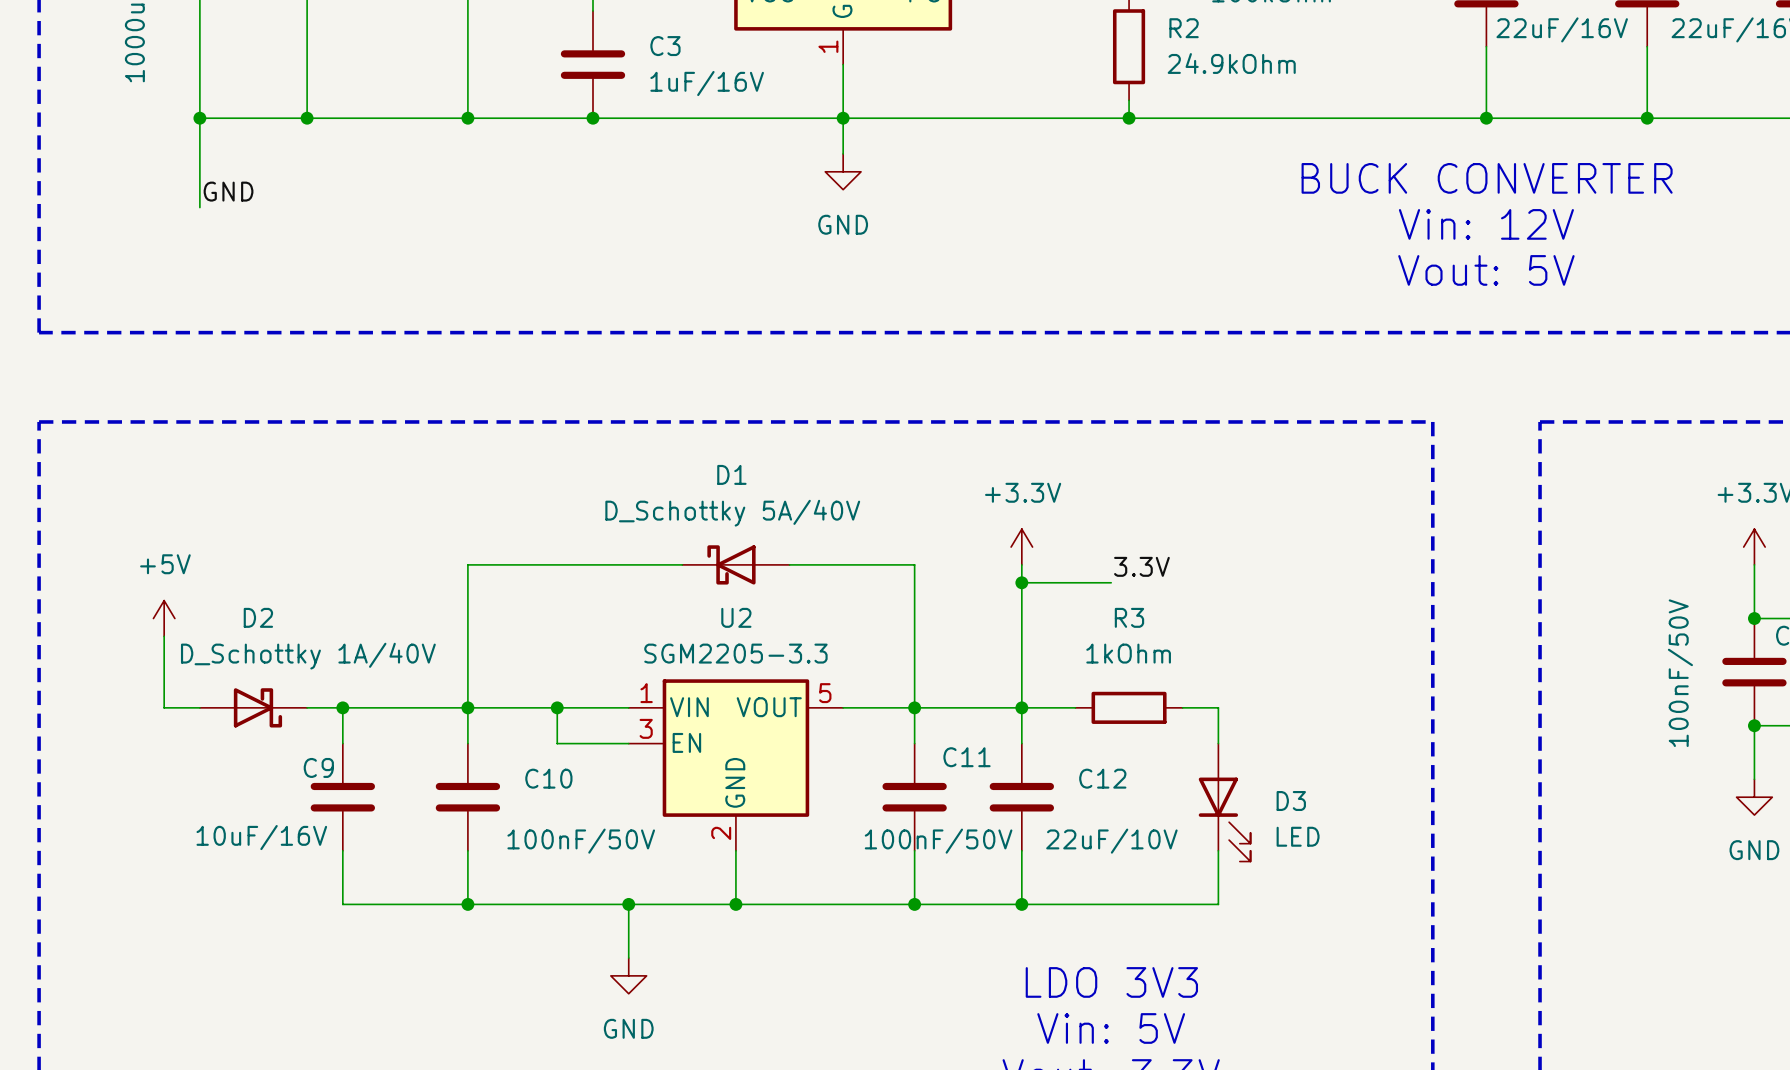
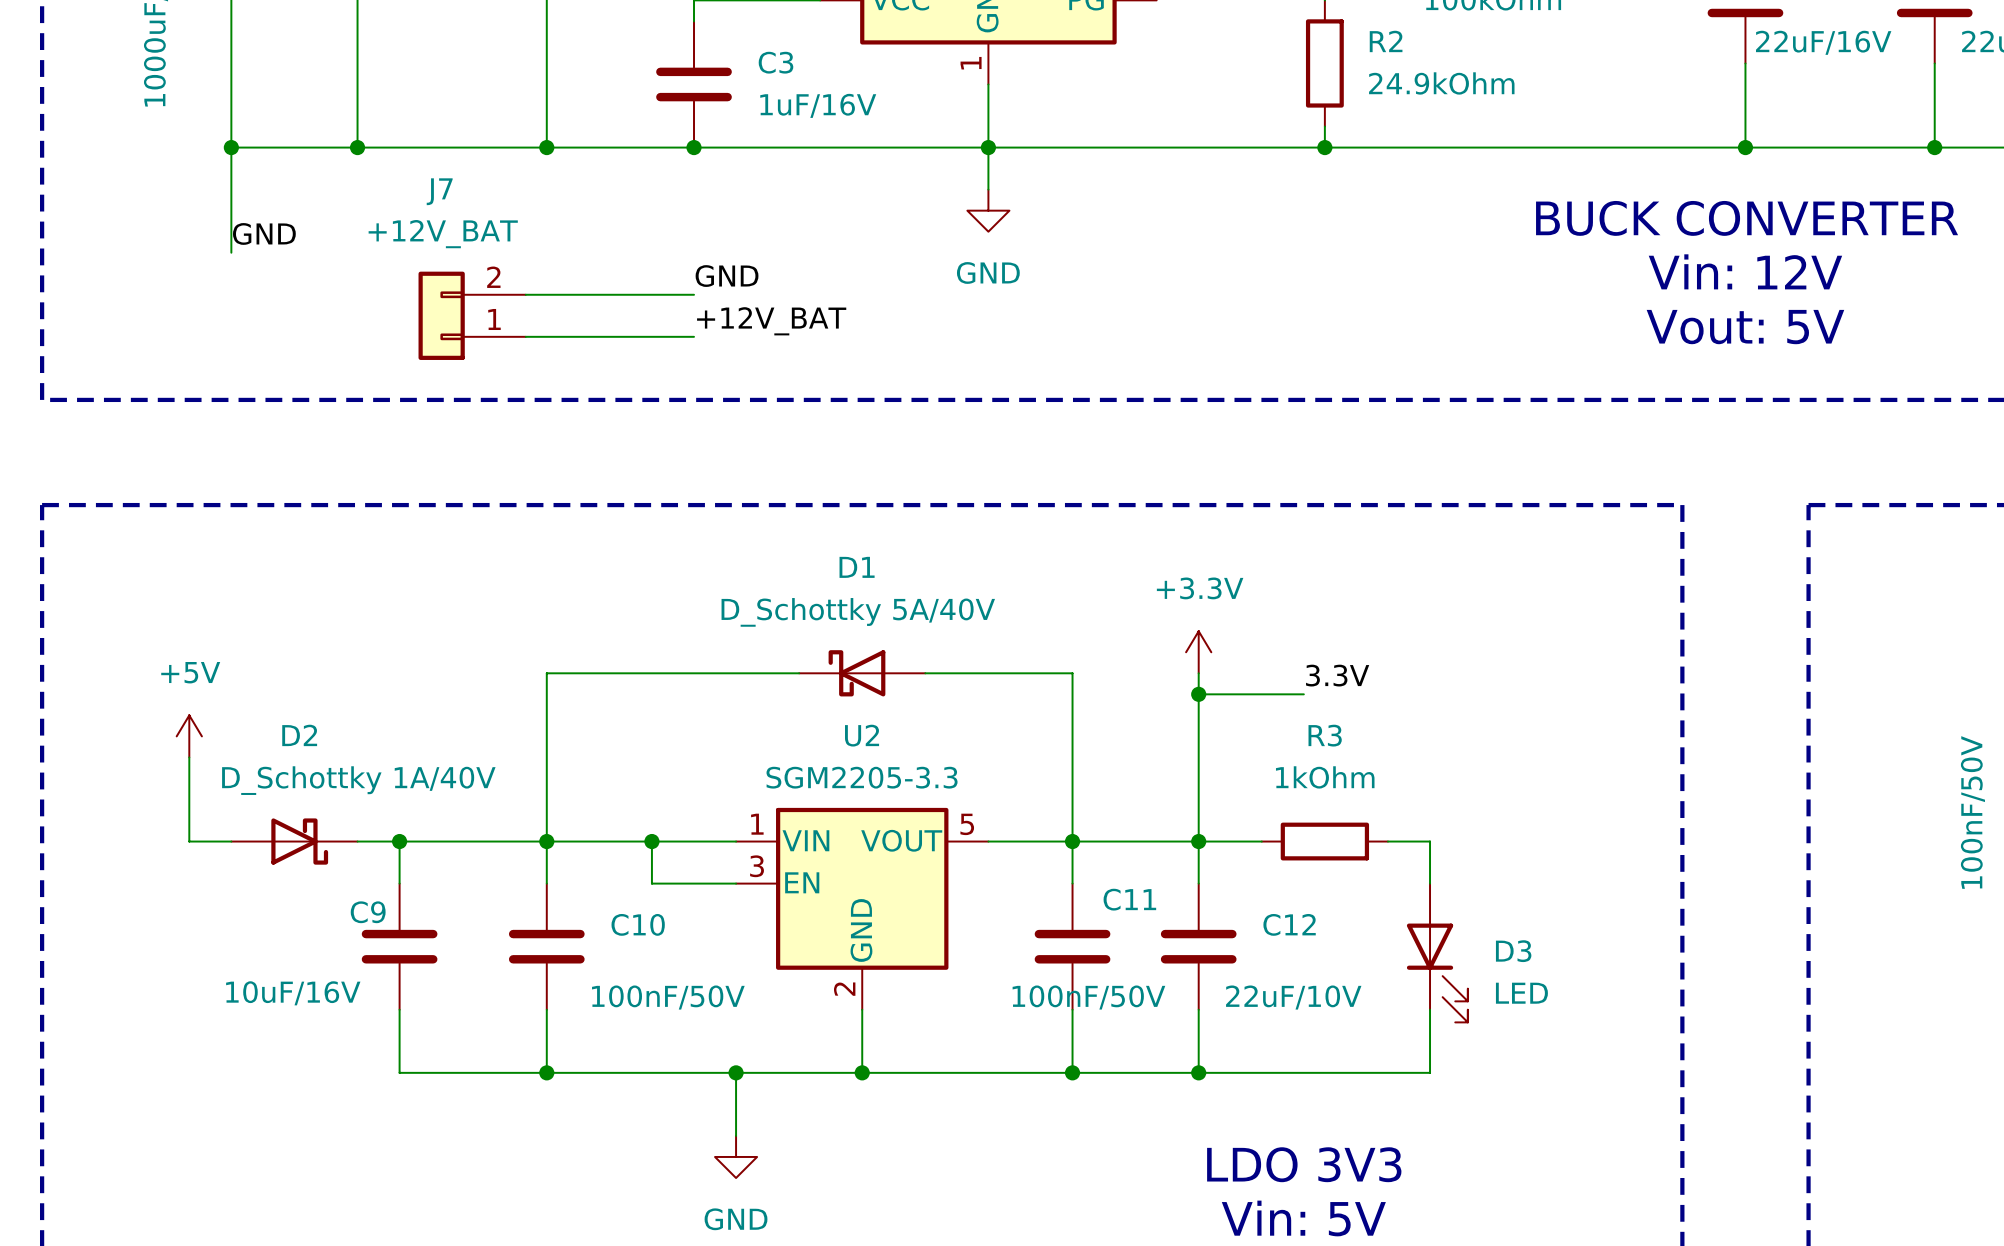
label: none -> GND (727, 276)
wire: none -> (525, 294) (694, 294)
J7: none -> +12V_BAT (472, 315)
label: none -> +12V_BAT (771, 321)
wire: none -> (525, 336) (694, 336)

